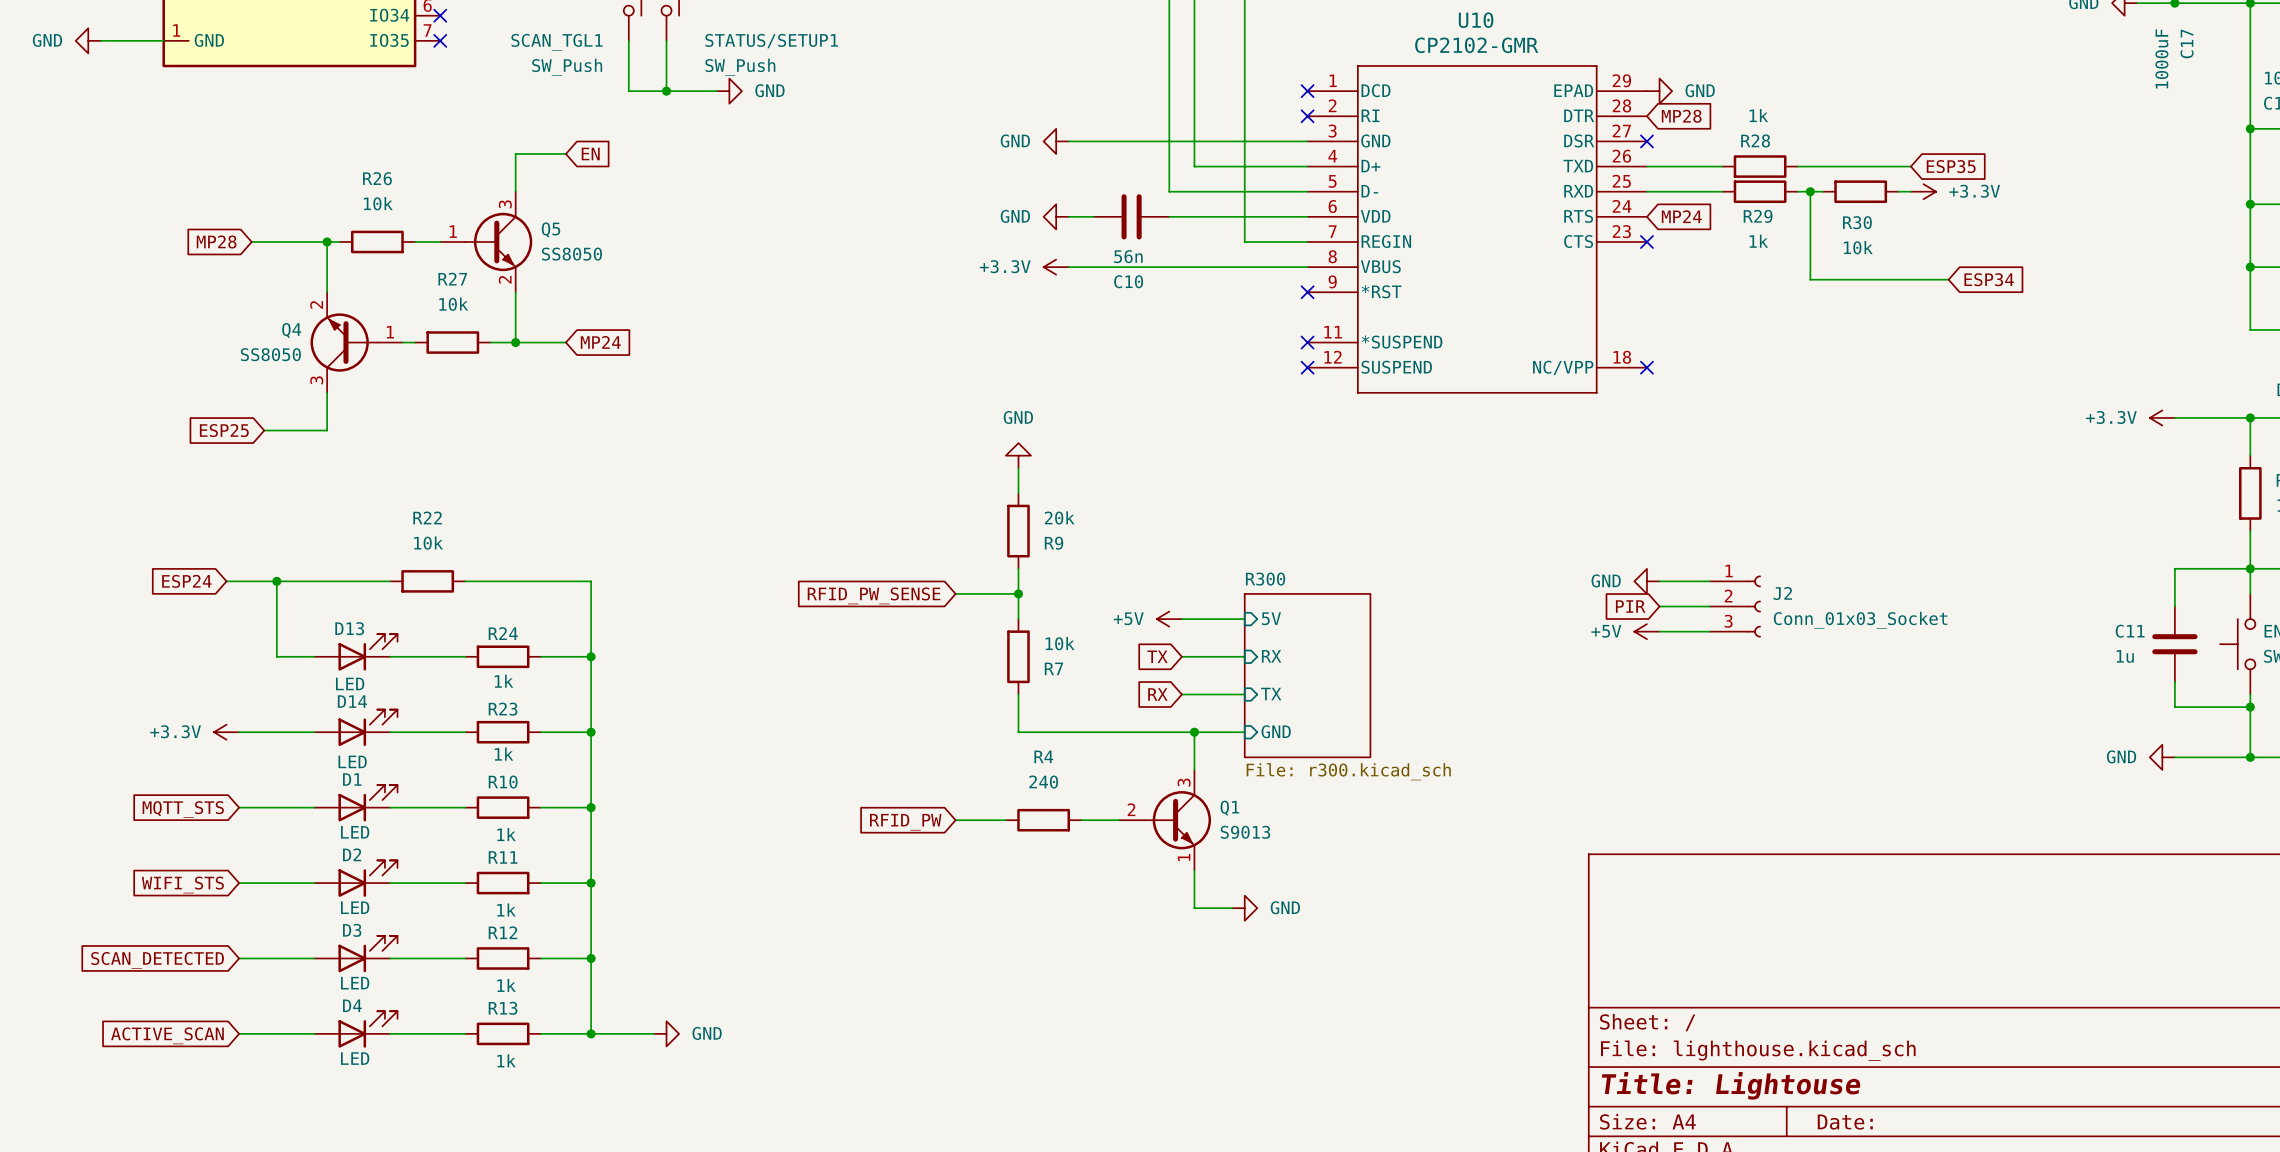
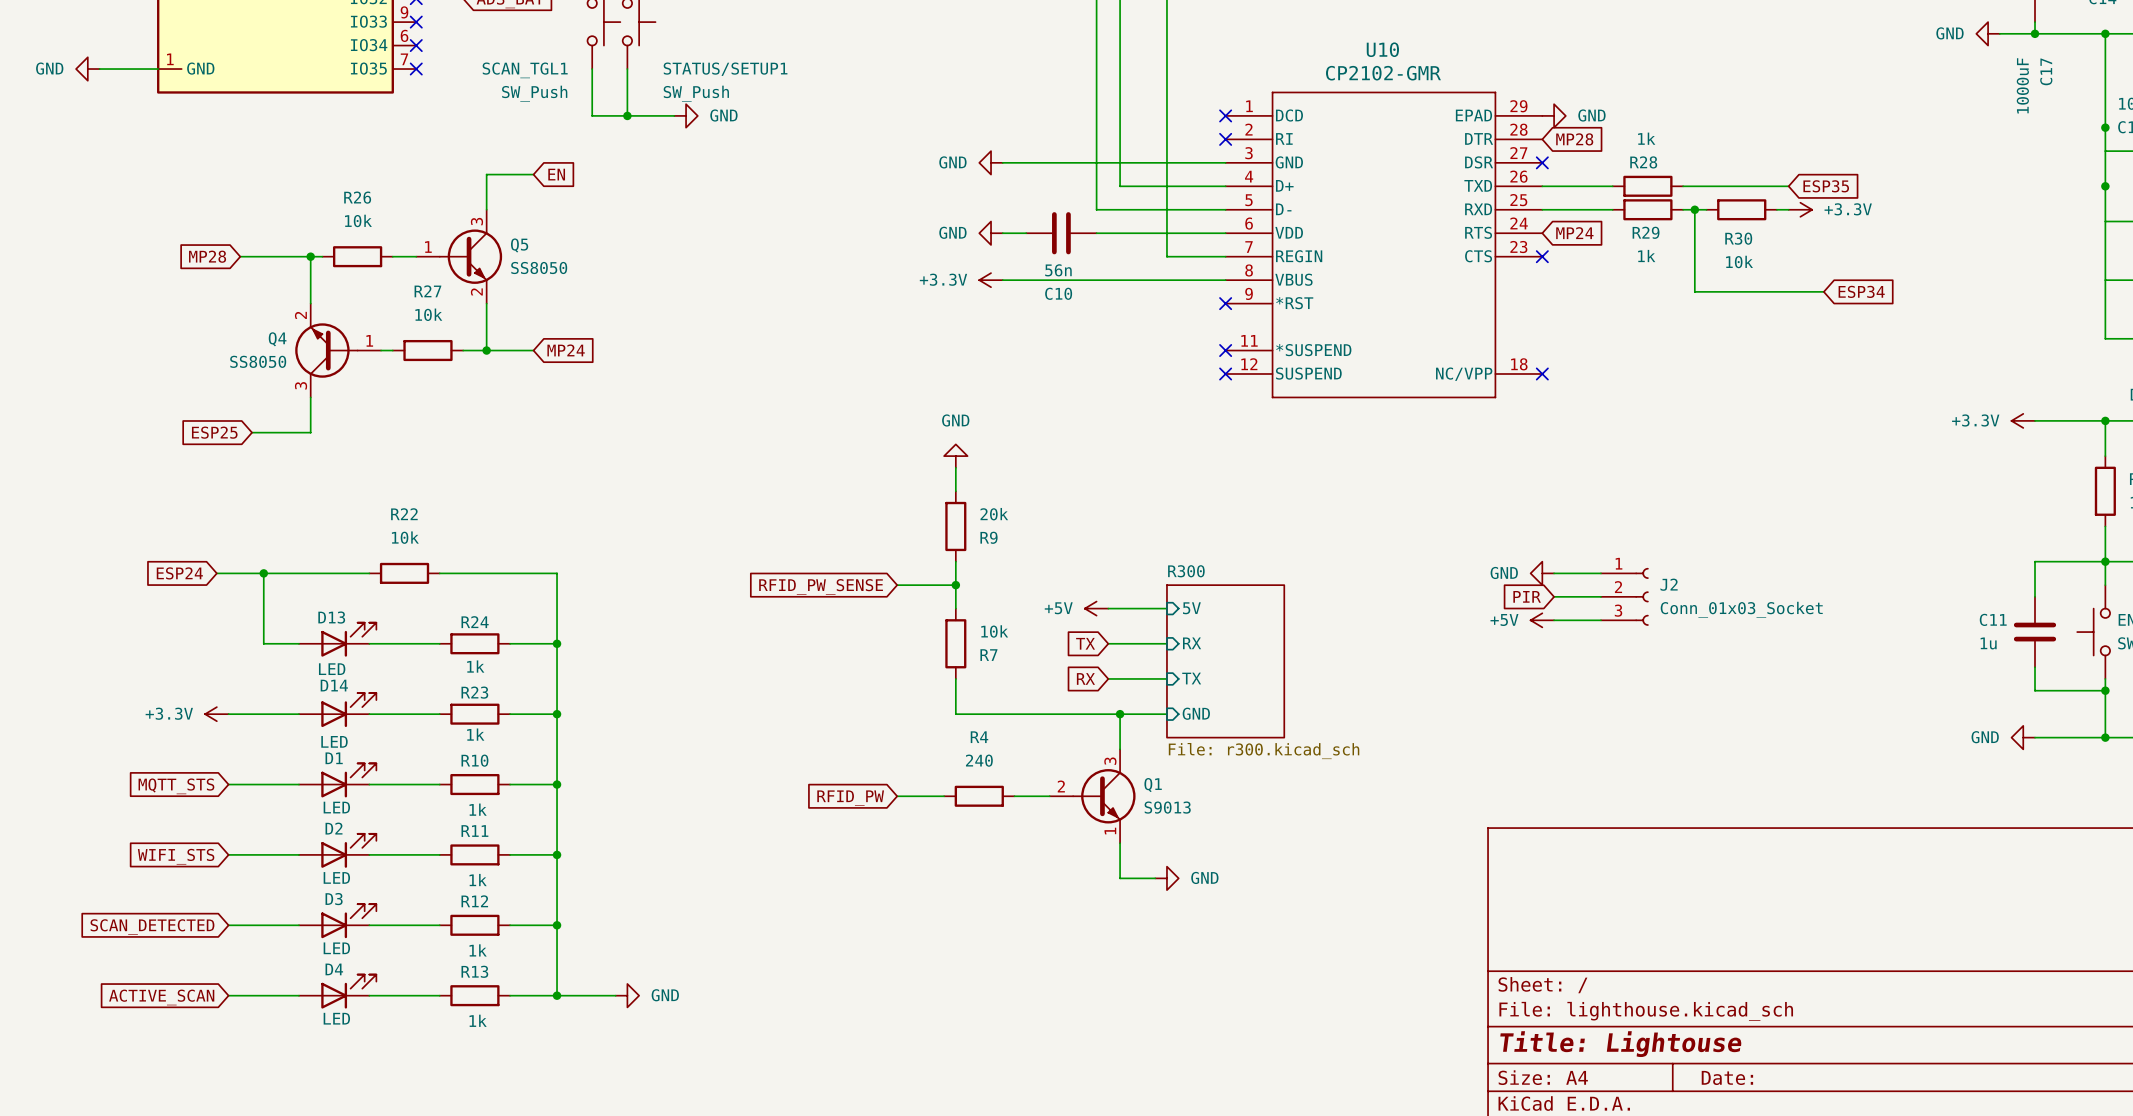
junction: none -> (2105, 127)
junction: (2250, 128) -> none
junction: none -> (2105, 186)
junction: (2250, 204) -> none
junction: (2250, 267) -> none

